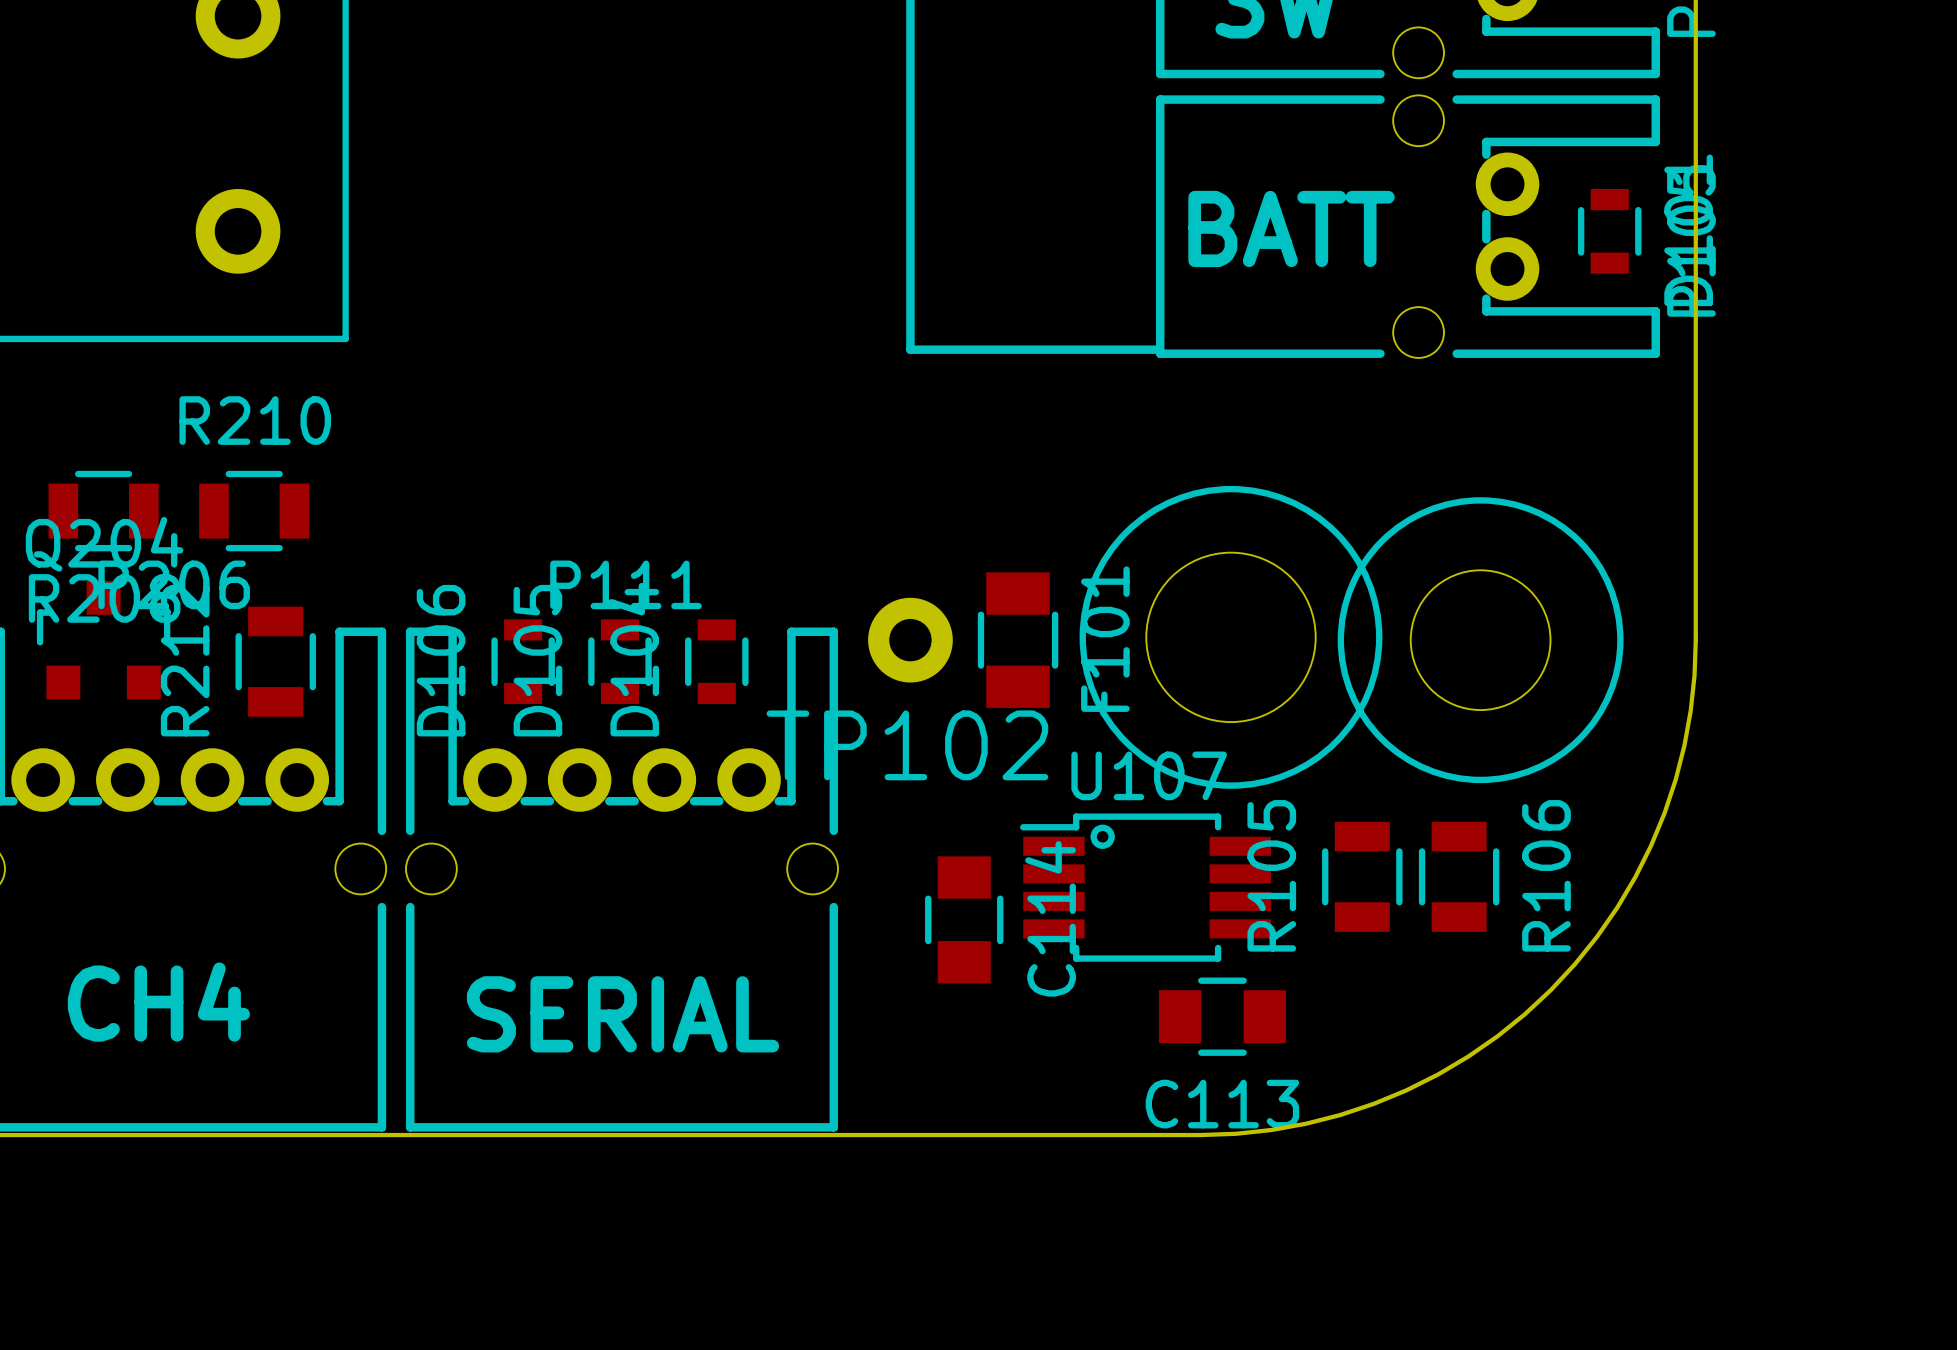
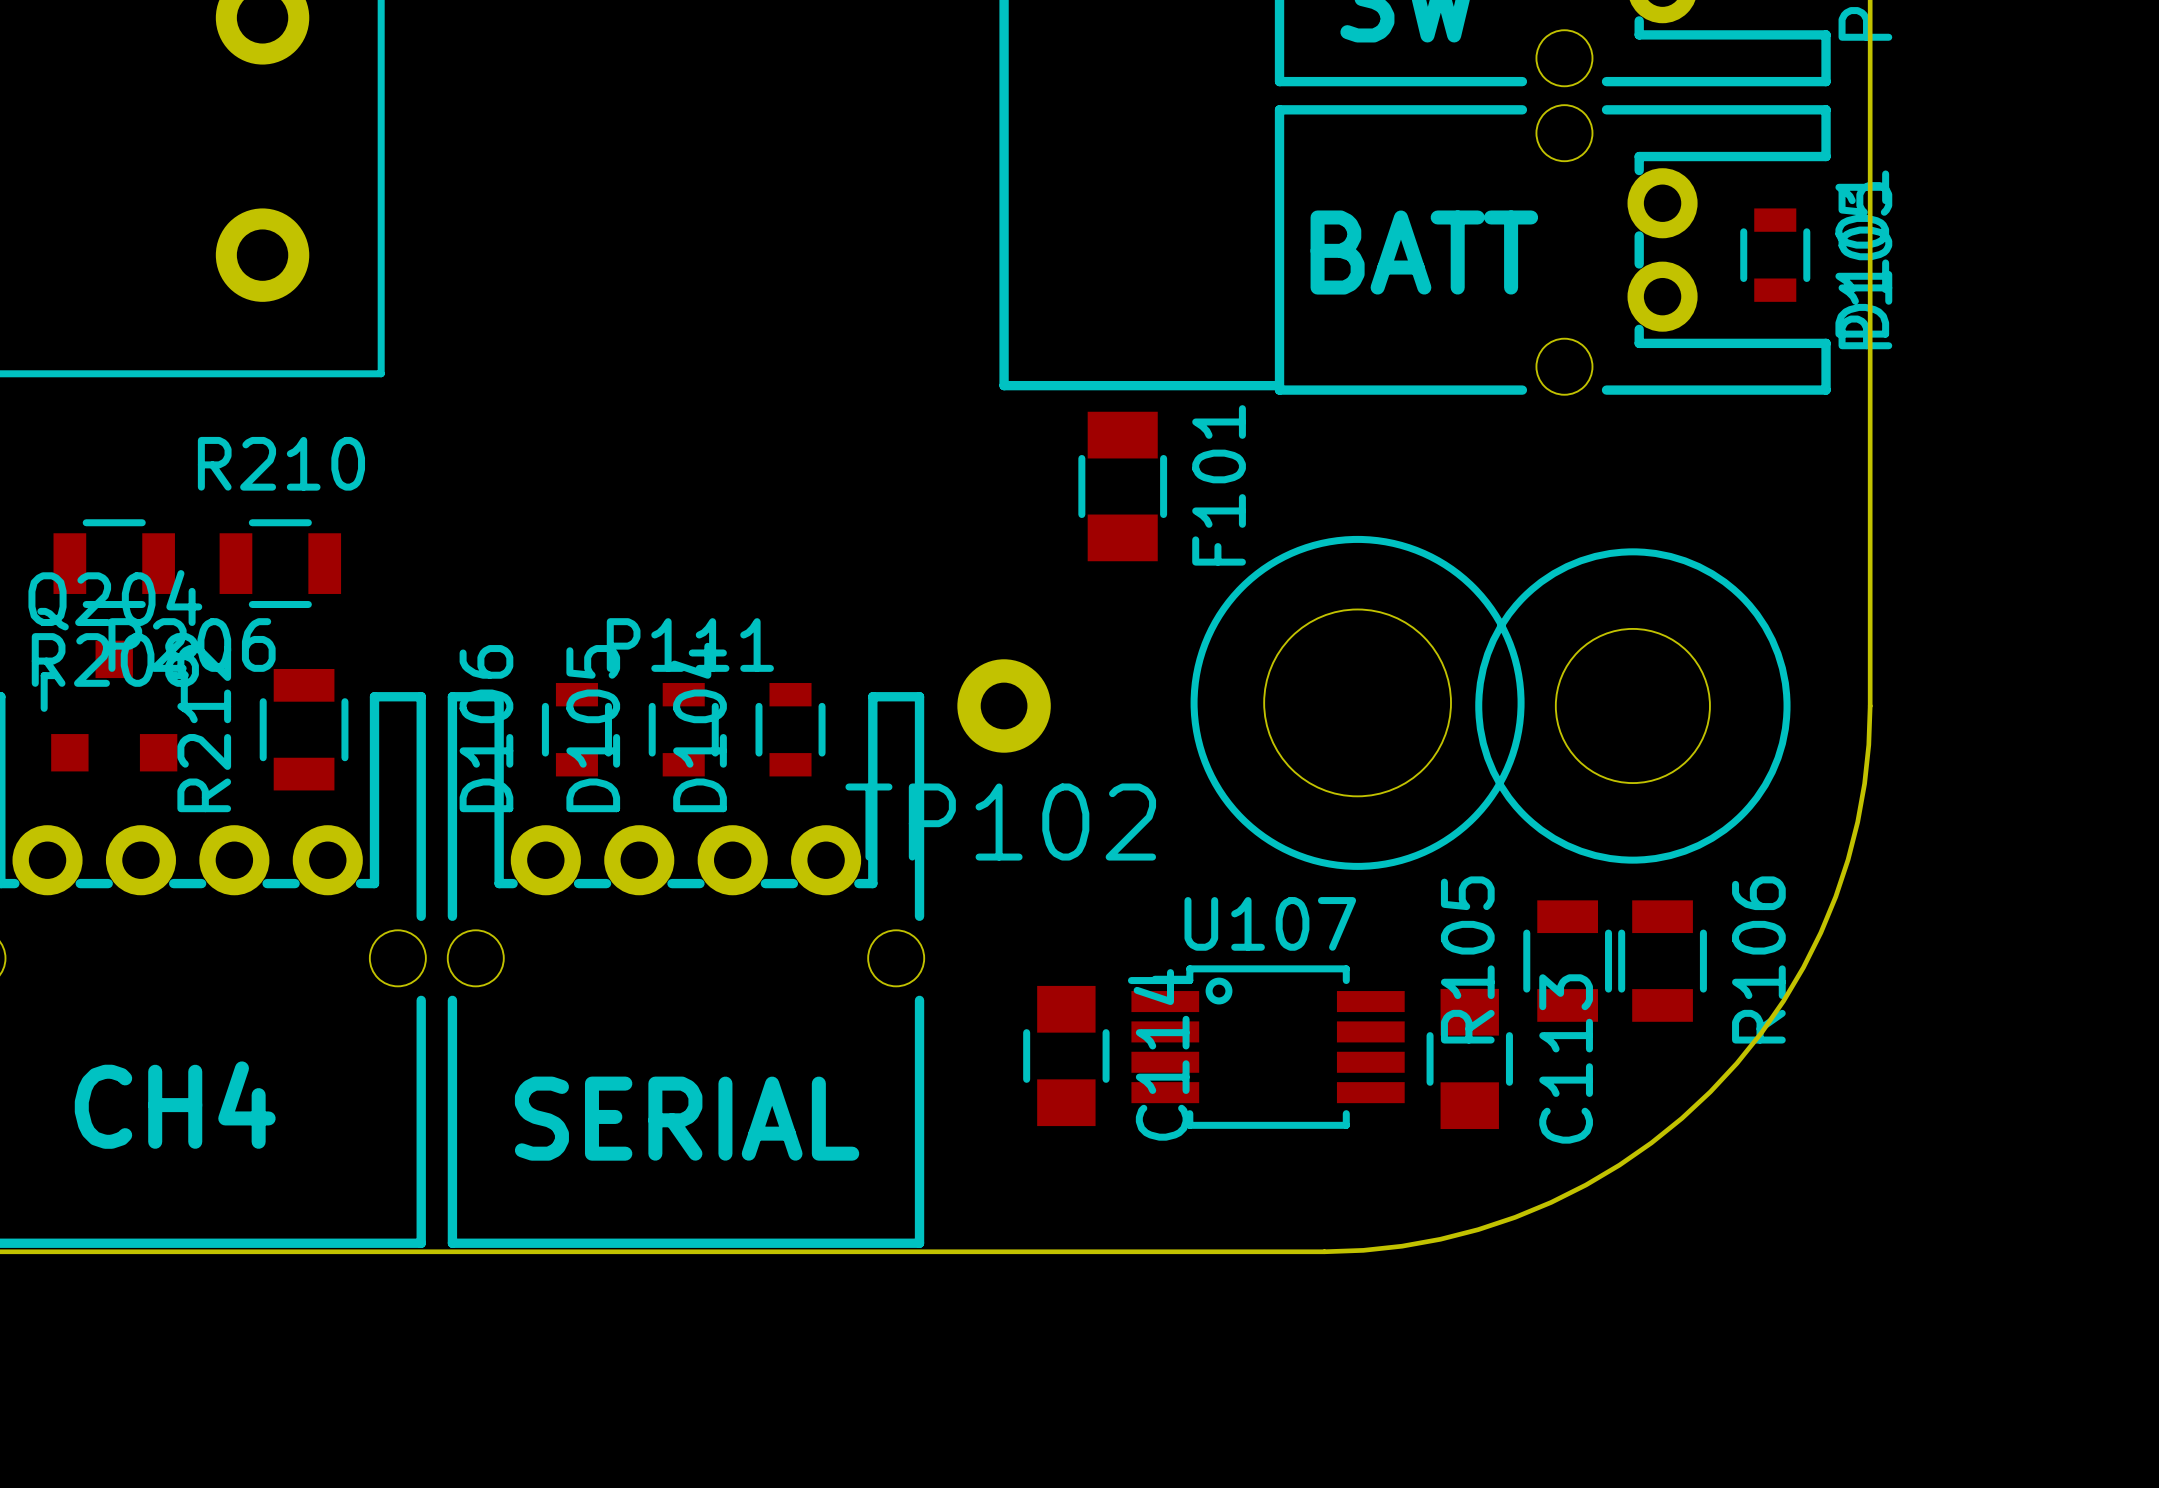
F101 position: (1018, 640) -> (1122, 486)
R105 position: (1362, 876) -> (1567, 961)
R106 position: (1459, 876) -> (1662, 961)
U107 position: (1145, 887) -> (1266, 1047)
C114 position: (964, 919) -> (1066, 1055)
C113 rotation: 0° (1222, 1016) -> 90° clockwise (1469, 1058)
C113 position: (1222, 1016) -> (1469, 1058)
C113 name position: C113 (1222, 1104) -> C113 (1566, 1058)

